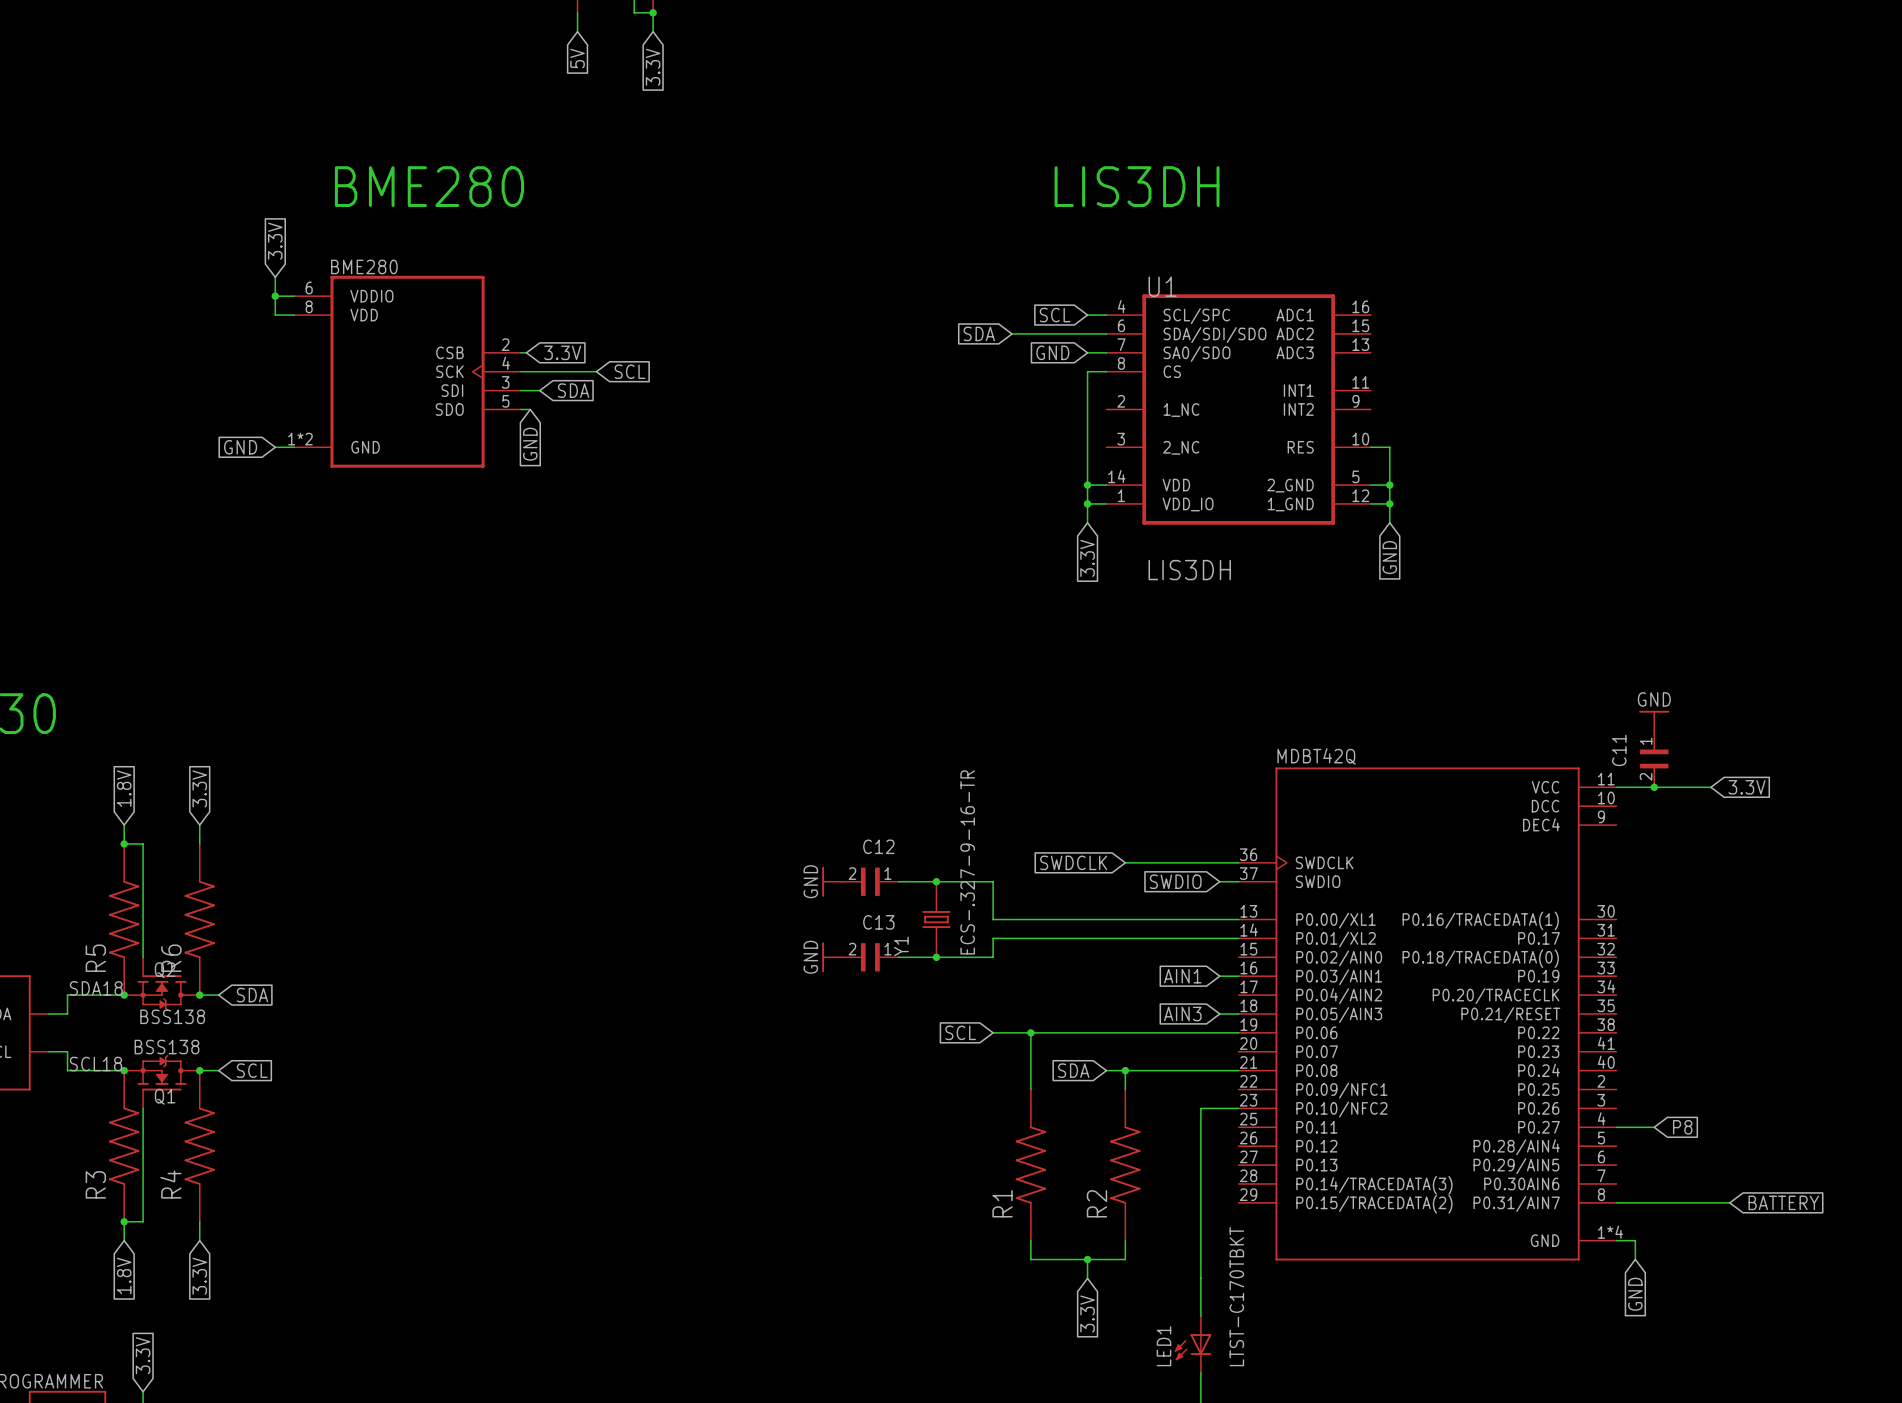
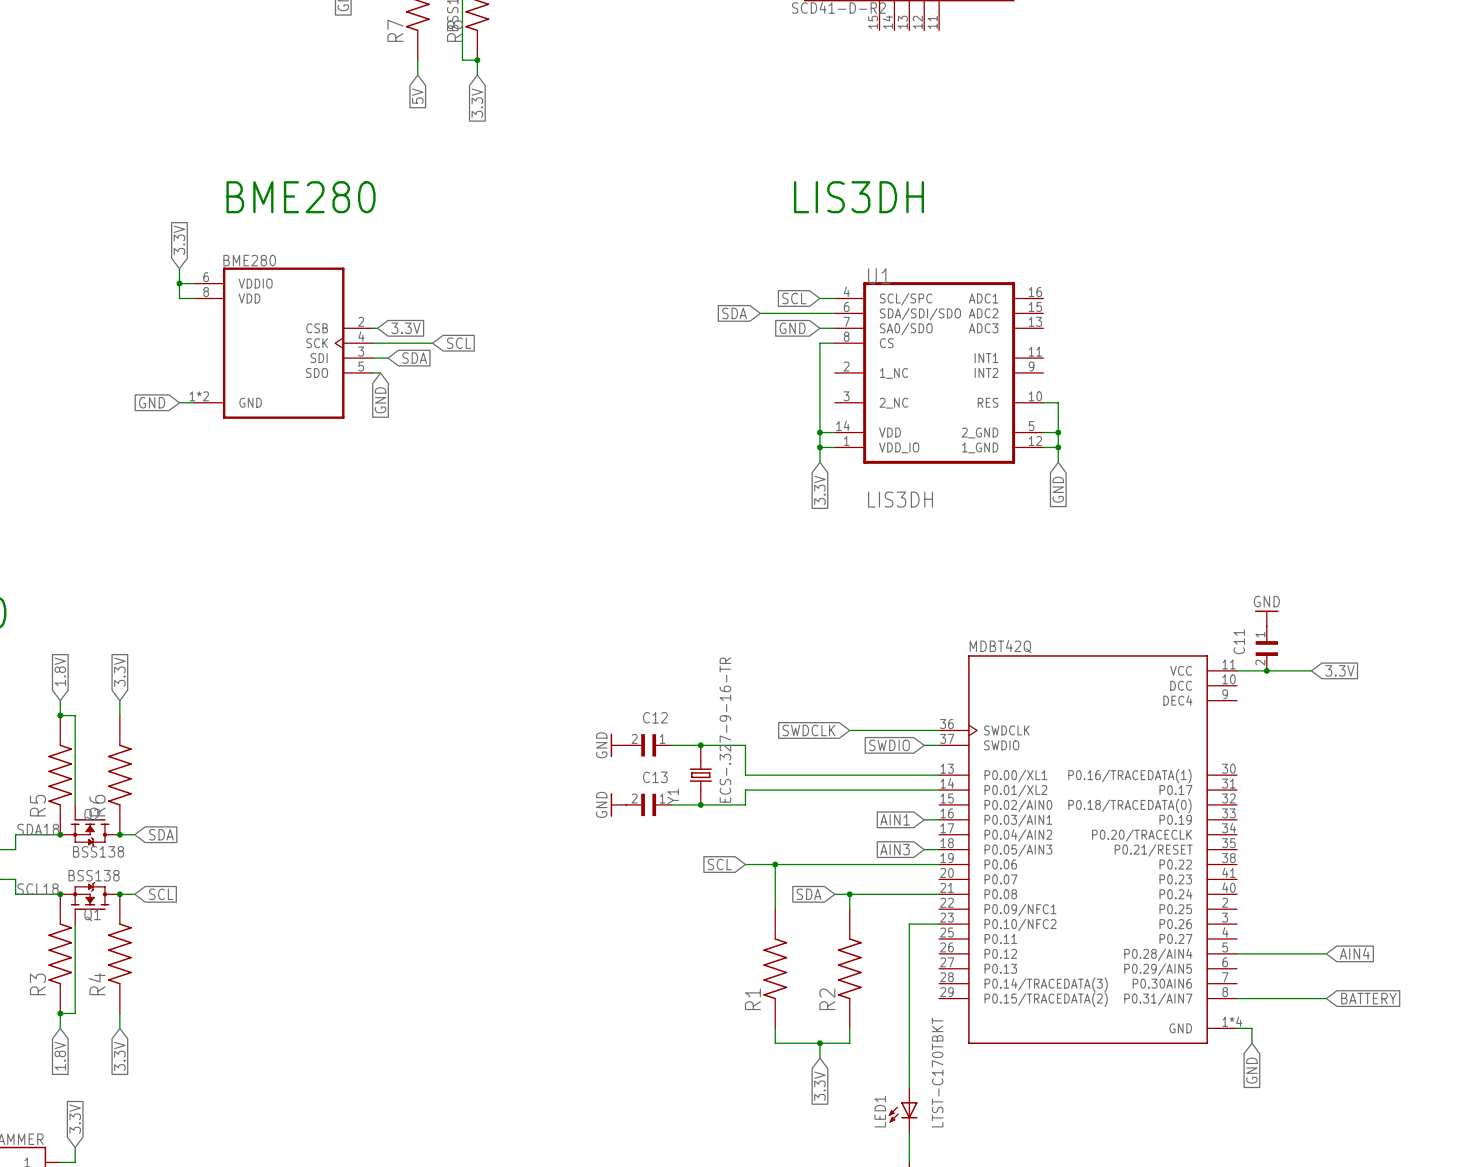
wire: (1616, 1127) (1654, 1127) -> none
global label: P8 (1682, 1127) -> none
global label: none -> AIN4 (1354, 953)
wire: none -> (1237, 953) (1326, 953)

